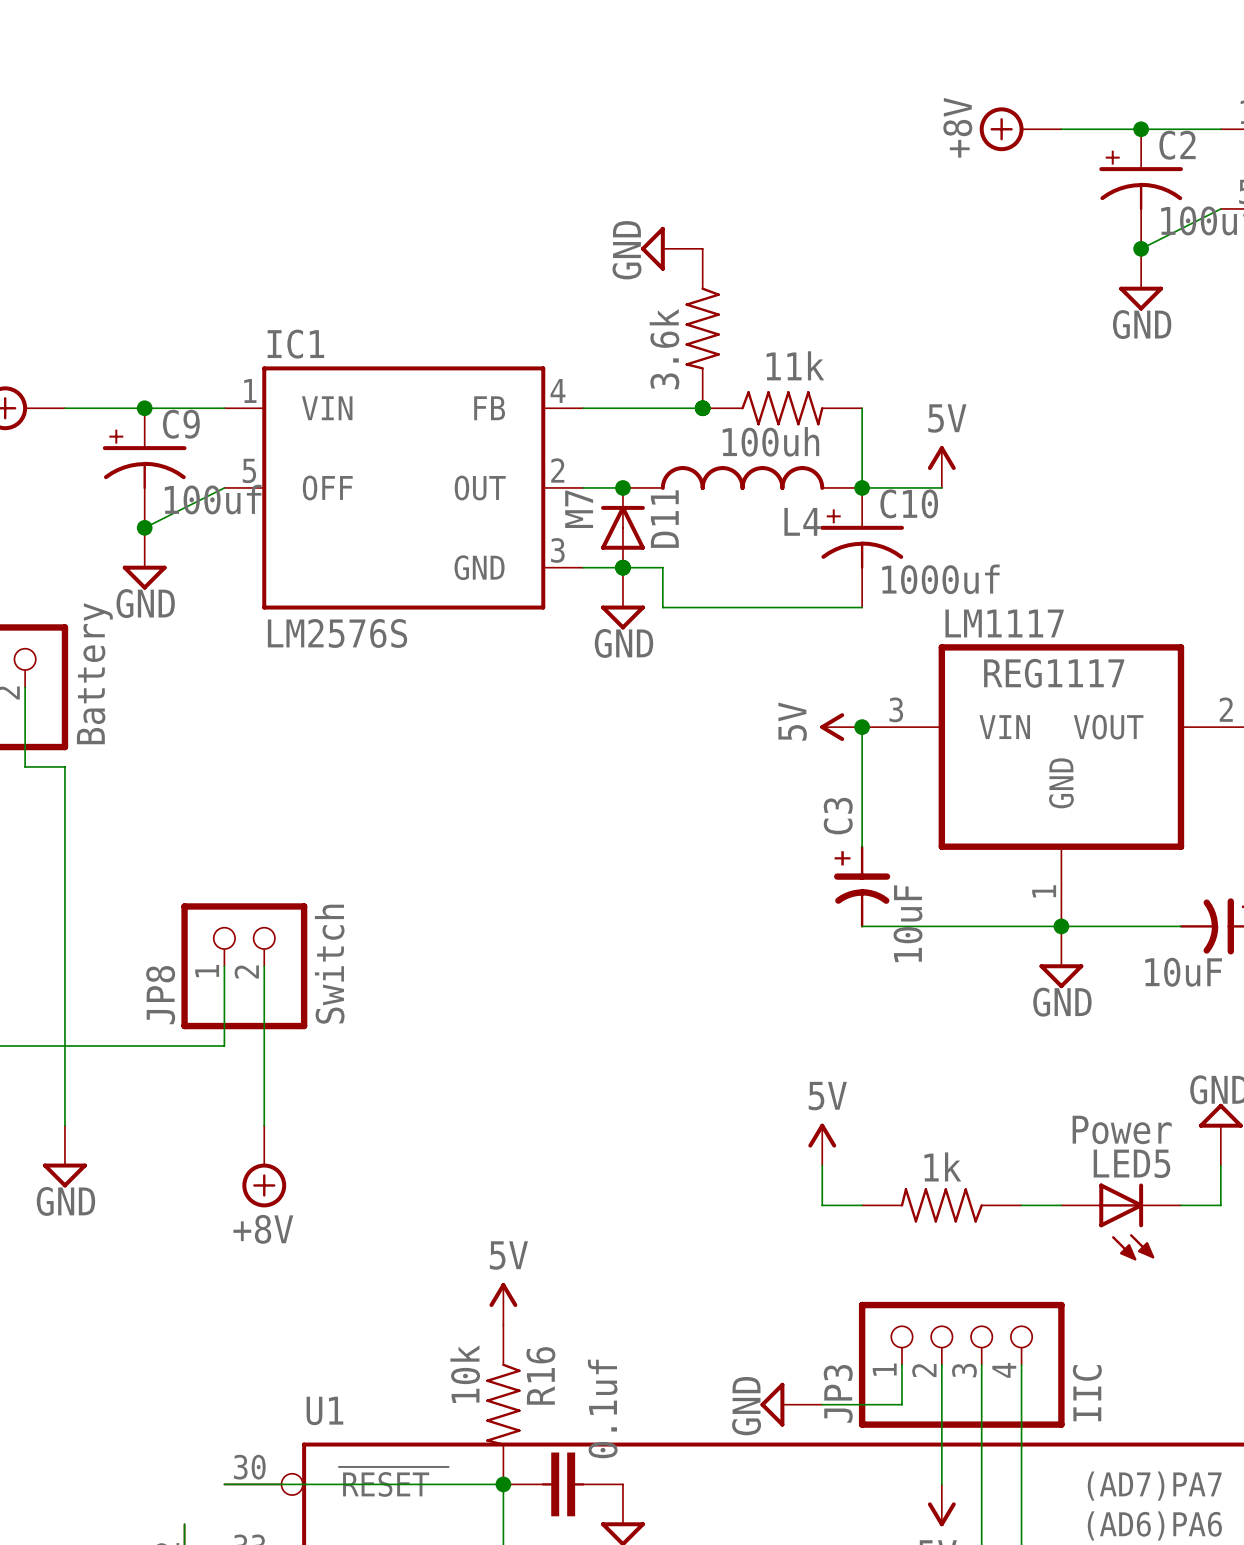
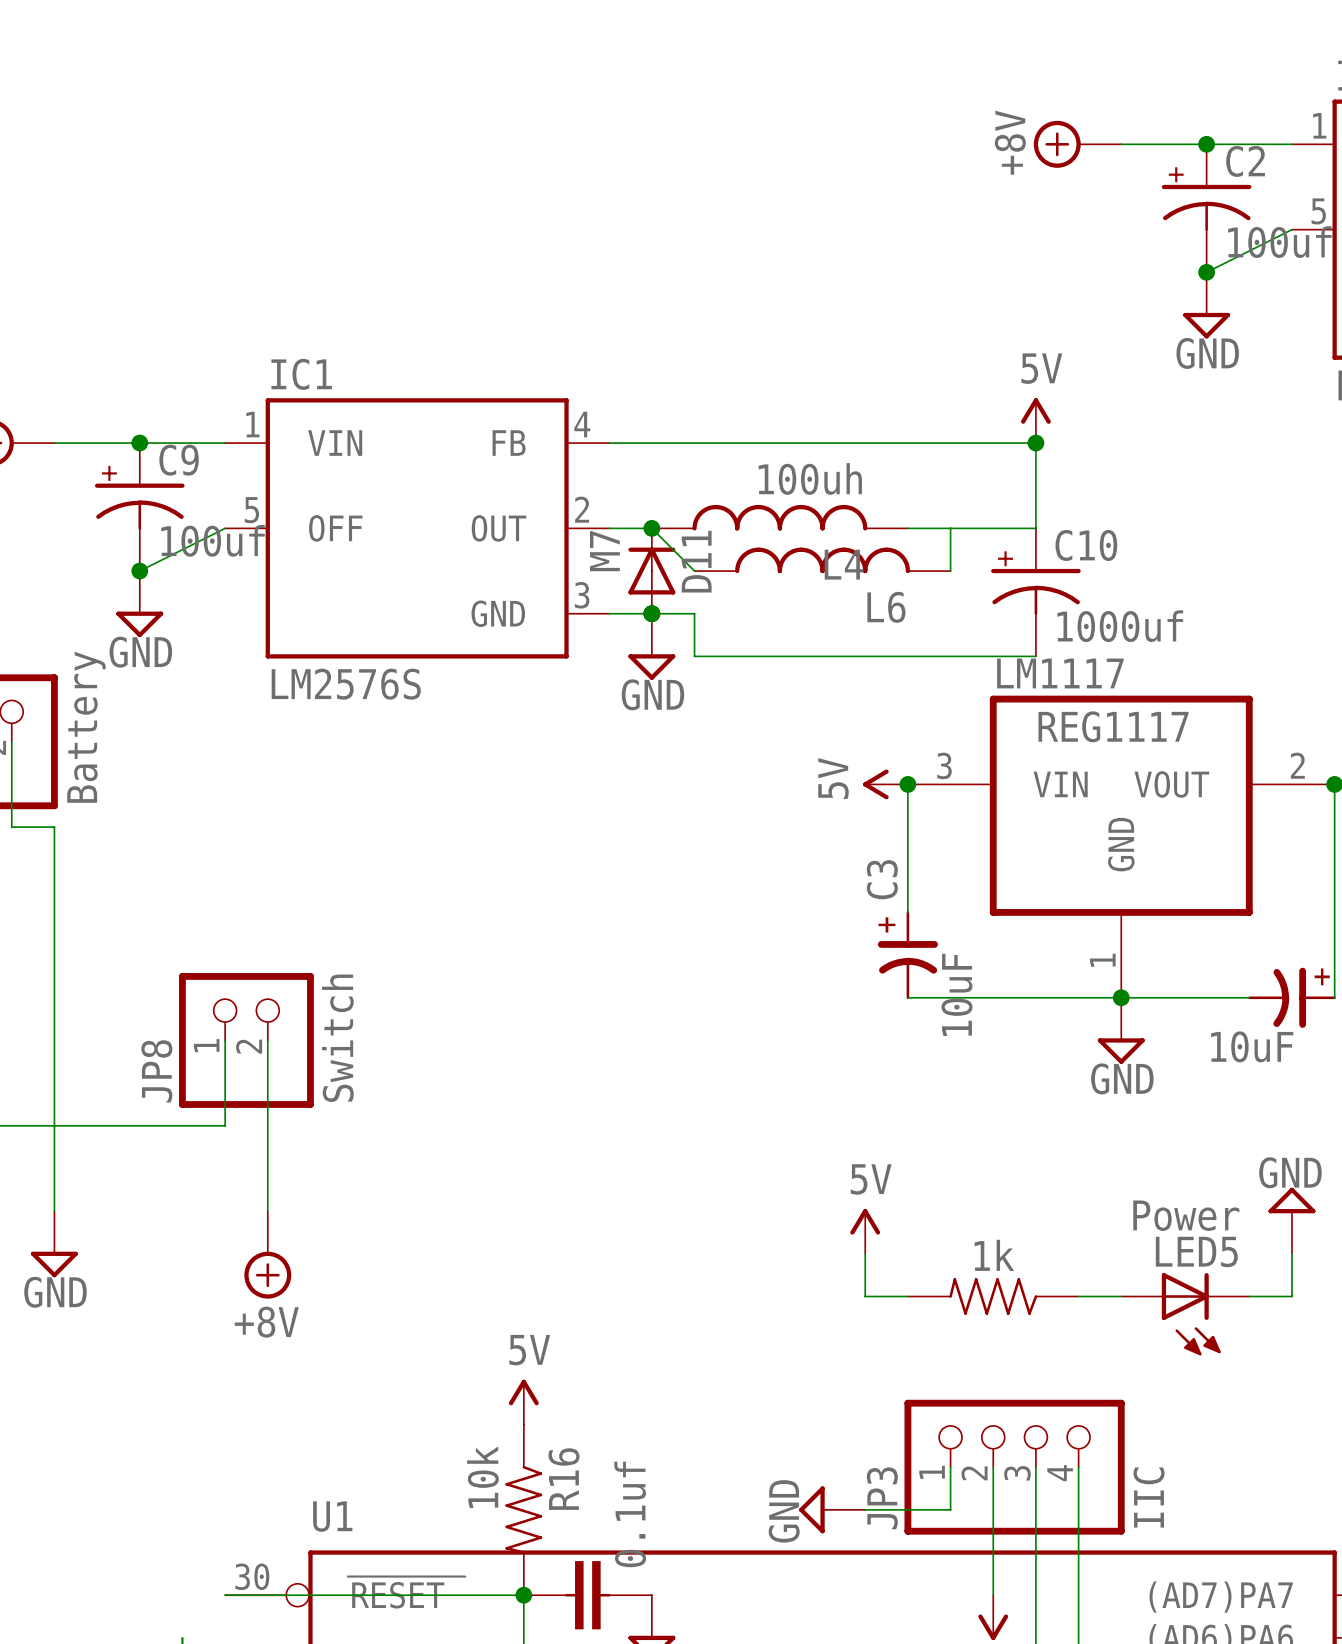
power symbol: GND (671, 248) -> none
part: 3.6k (702, 328) -> none
wire: none -> (737, 443) (1035, 443) (1035, 528) (993, 528)
junction: (702, 408) -> none
part: 11k (782, 408) -> none
wire: (862, 408) (862, 487) -> none
junction: none -> (1035, 443)
power symbol position: 5V (941, 467) -> 5V (1035, 420)
wire: none -> (651, 528) (694, 571)
junction: (862, 487) -> none
wire: none -> (950, 528) (950, 571)
L6: none -> (822, 560)
C10 position: (862, 547) -> (1035, 592)
wire: none -> (907, 656) (1035, 656)

